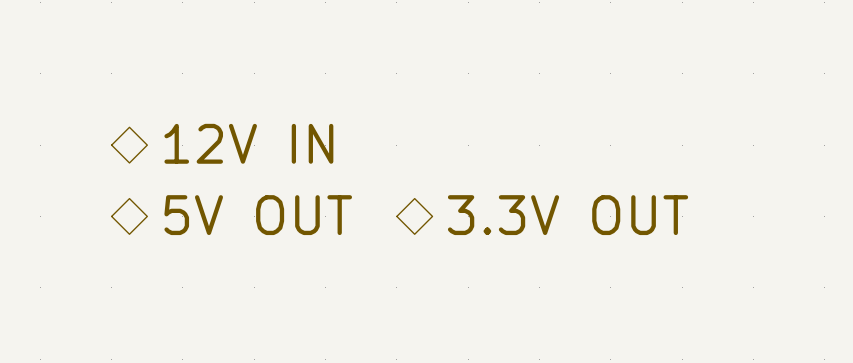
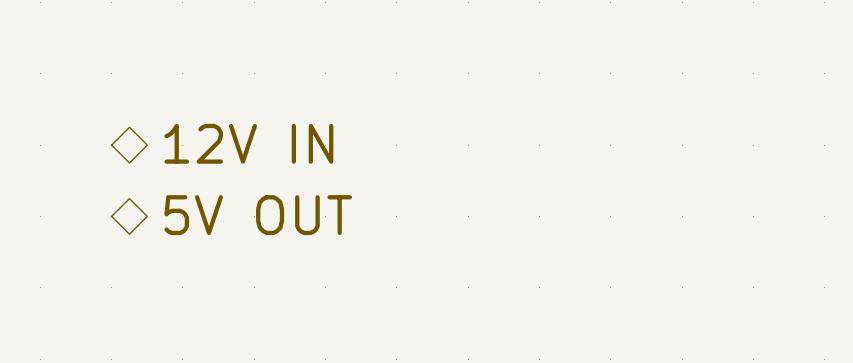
hierarchical label: 3.3V OUT (568, 215) -> none

